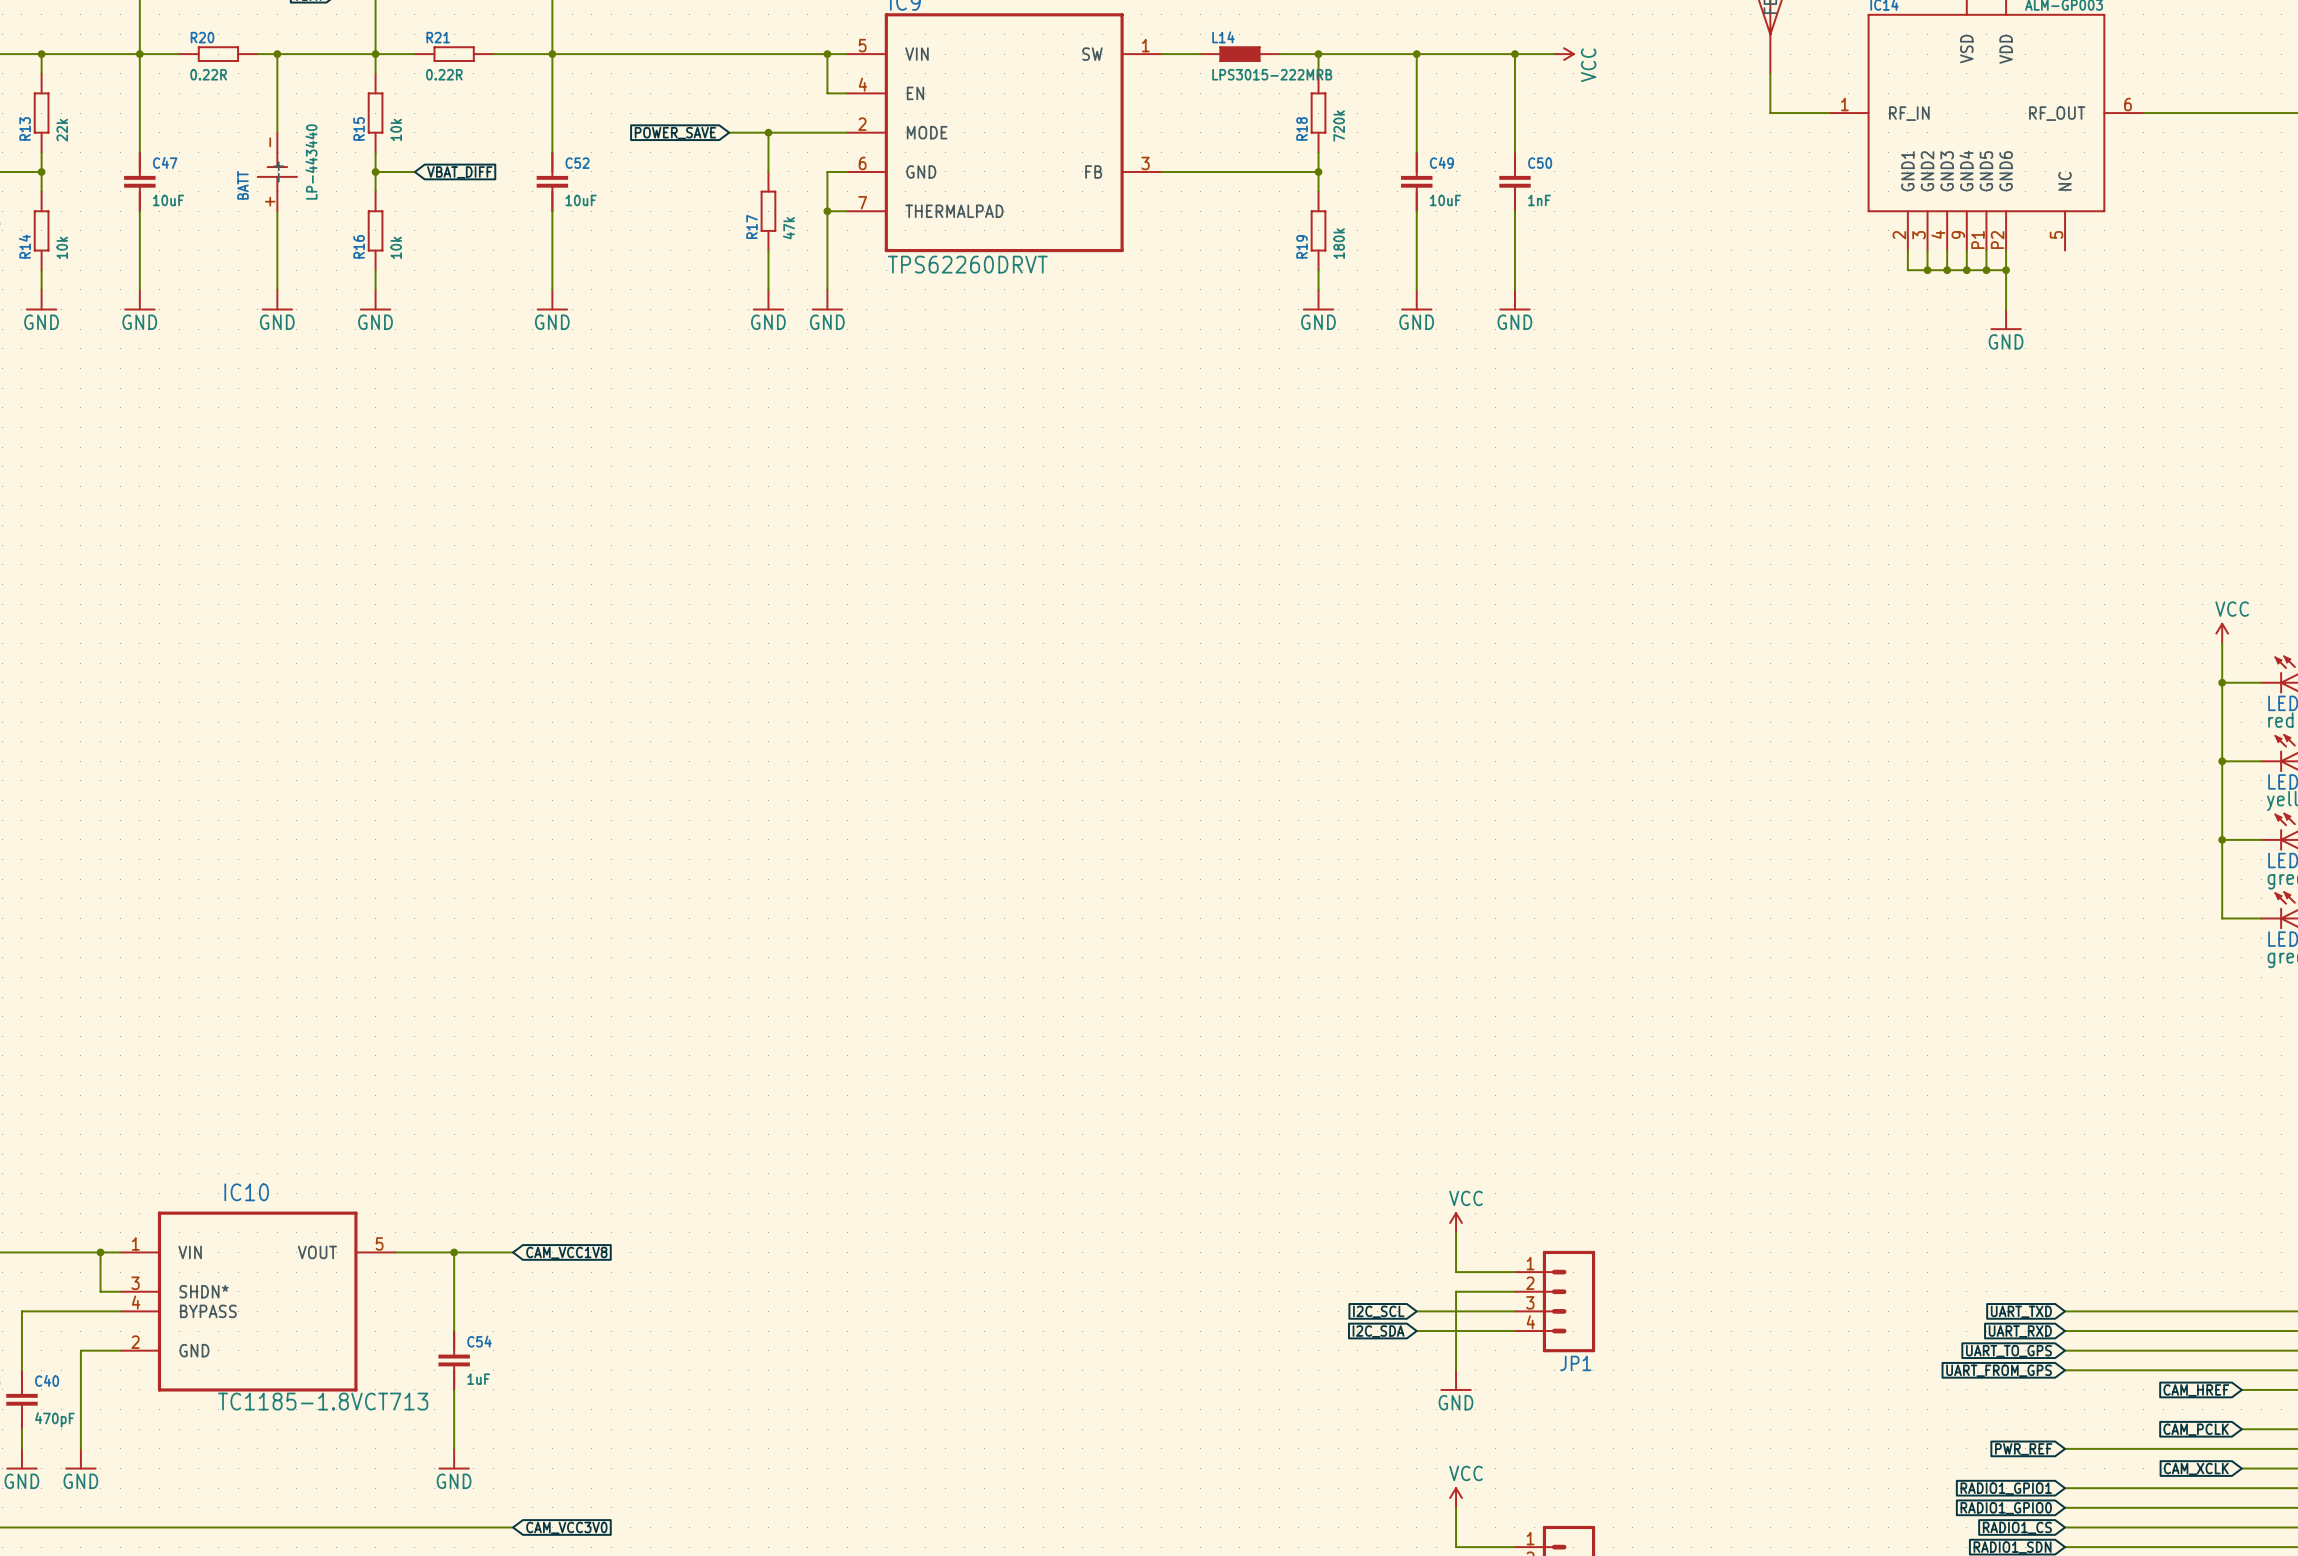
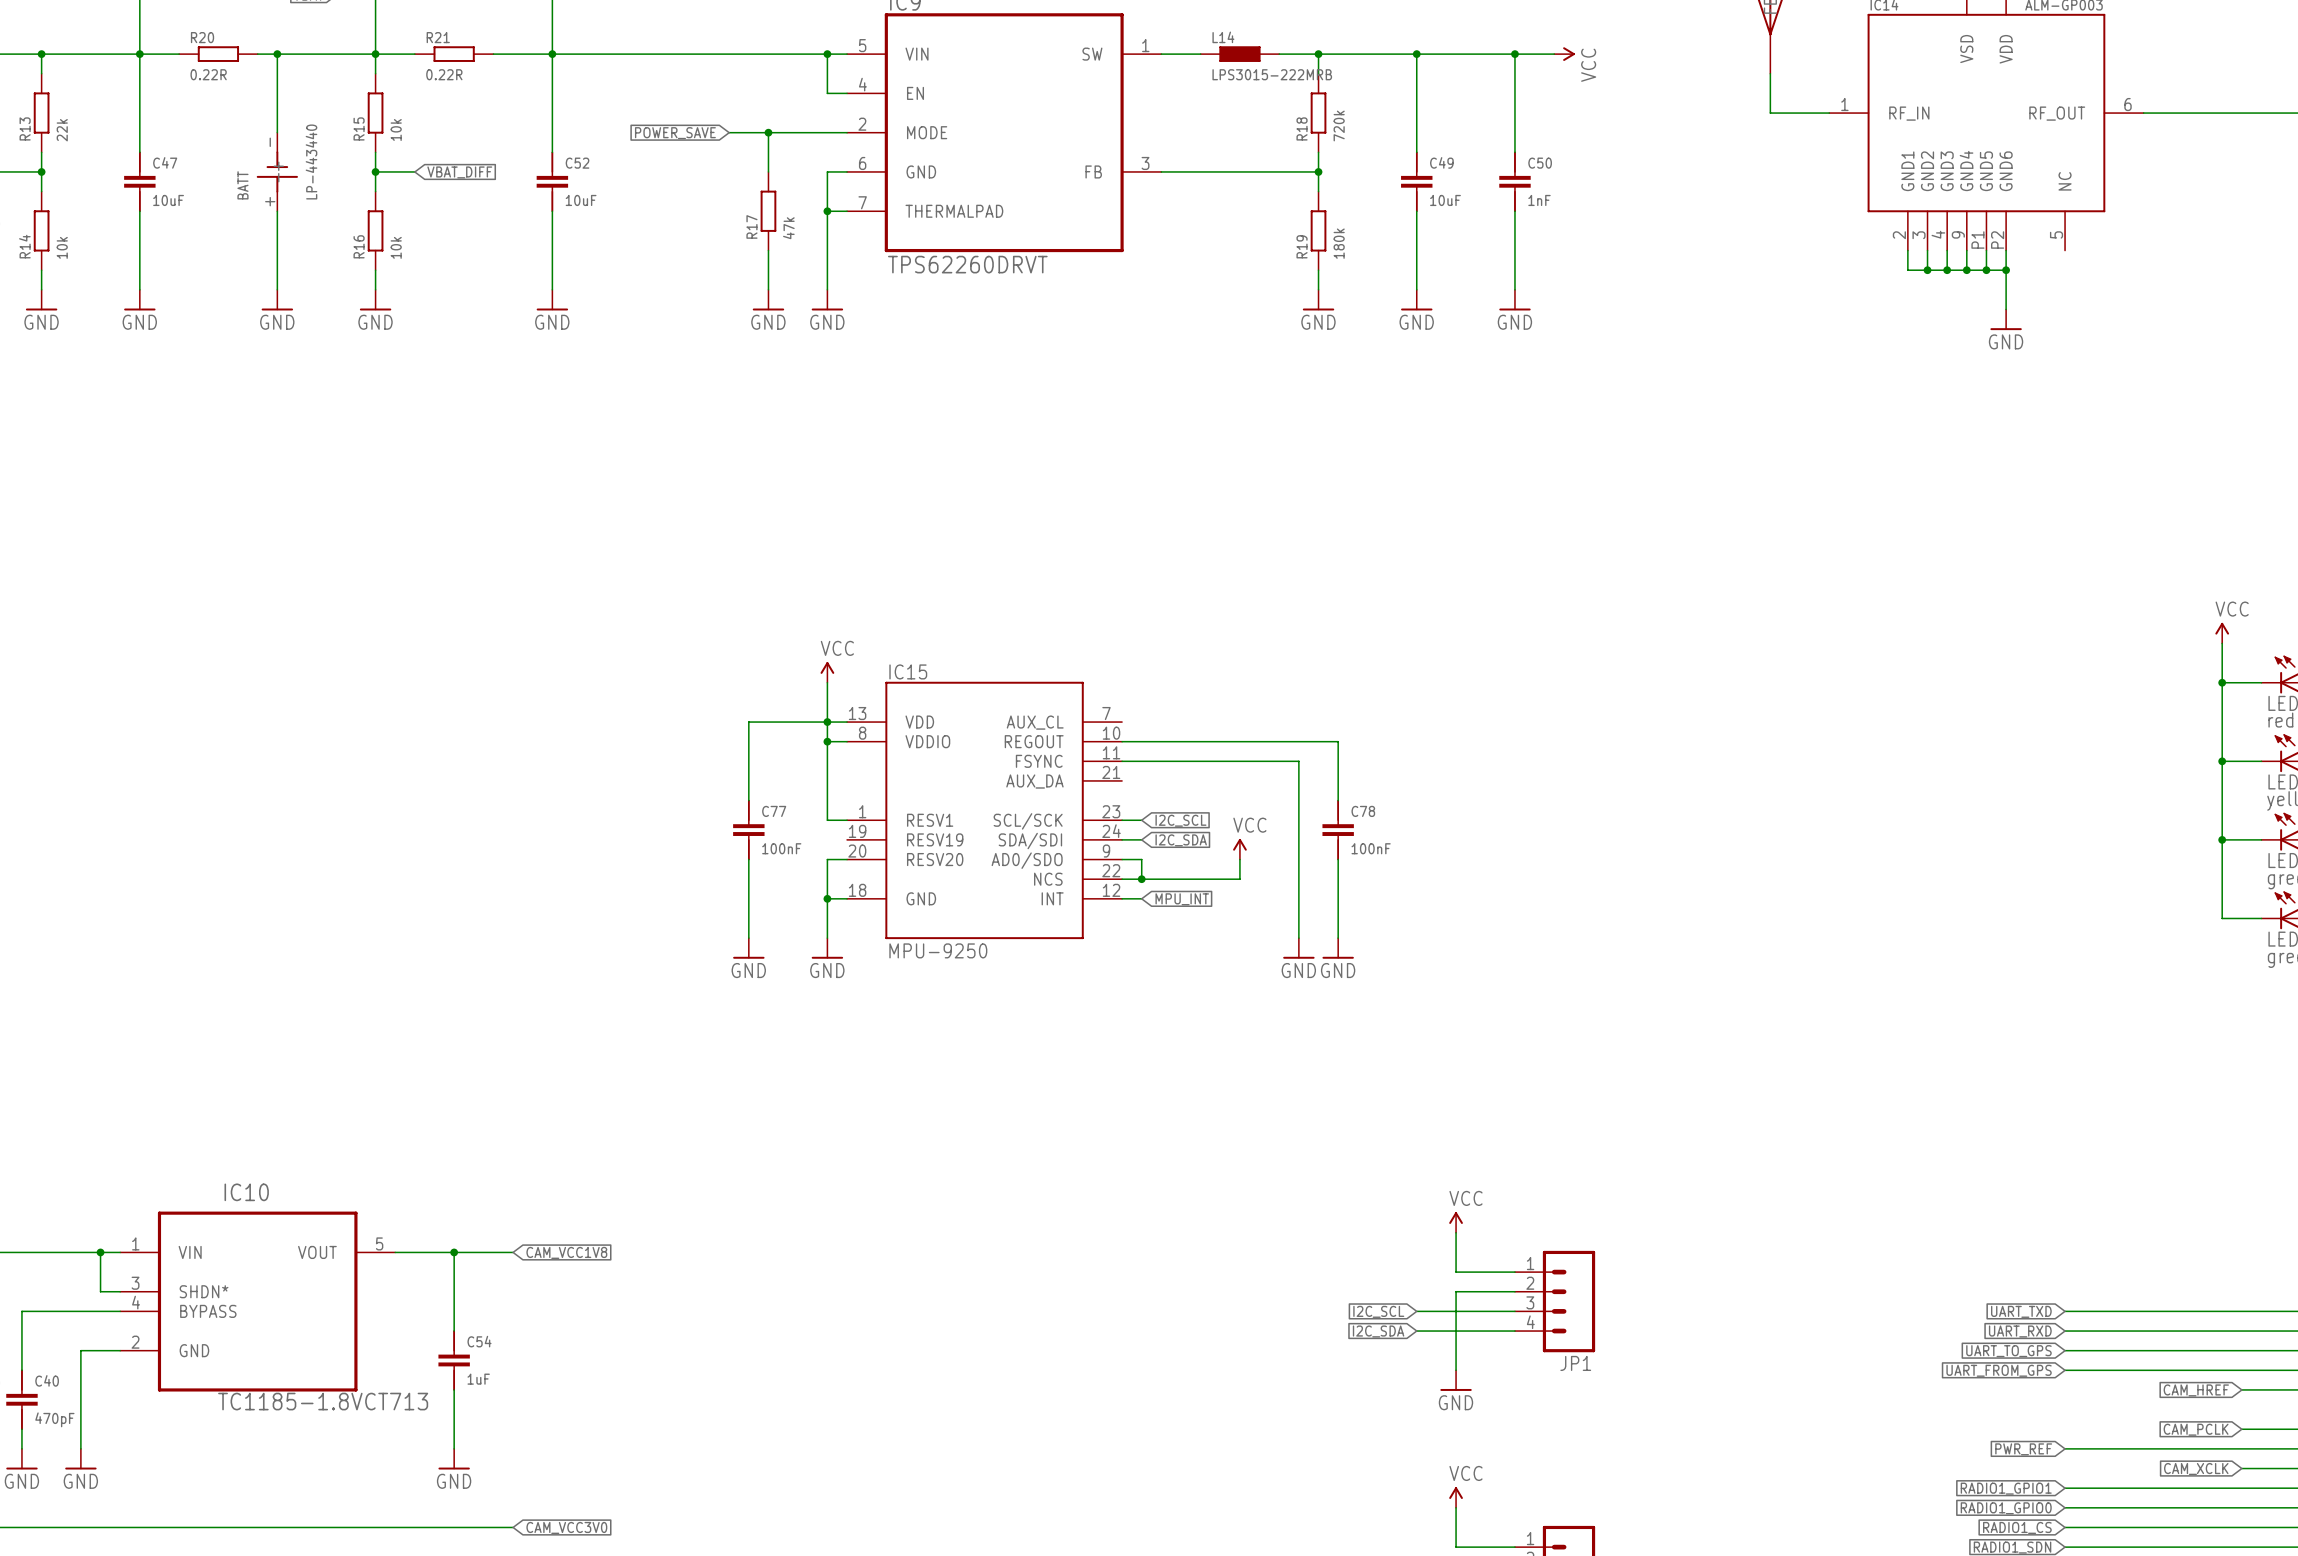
power symbol: none -> VCC (827, 672)
wire: none -> (827, 682) (827, 820) (847, 820)
junction: none -> (827, 722)
wire: none -> (847, 722) (748, 722) (748, 800)
wire: none -> (827, 741) (847, 741)
junction: none -> (827, 741)
wire: none -> (1122, 741) (1338, 741) (1338, 800)
wire: none -> (1122, 761) (1298, 761) (1298, 938)
IC15: none -> MPU-9250 (984, 810)
wire: none -> (1122, 820) (1141, 820)
global label: none -> I2C_SCL (1180, 820)
C77: none -> 100nF (748, 830)
C78: none -> 100nF (1338, 830)
wire: none -> (1122, 839) (1141, 839)
global label: none -> I2C_SDA (1181, 840)
power symbol: none -> VCC (1239, 849)
wire: none -> (748, 859) (748, 938)
wire: none -> (847, 859) (827, 859) (827, 938)
wire: none -> (1122, 859) (1141, 859) (1141, 879)
wire: none -> (1239, 859) (1239, 879) (1122, 879)
wire: none -> (1338, 859) (1338, 938)
junction: none -> (1141, 879)
wire: none -> (827, 898) (847, 898)
junction: none -> (827, 898)
wire: none -> (1122, 898) (1141, 898)
global label: none -> MPU_INT (1182, 899)
power symbol: none -> GND (748, 948)
power symbol: none -> GND (827, 948)
power symbol: none -> GND (1298, 948)
power symbol: none -> GND (1338, 948)

